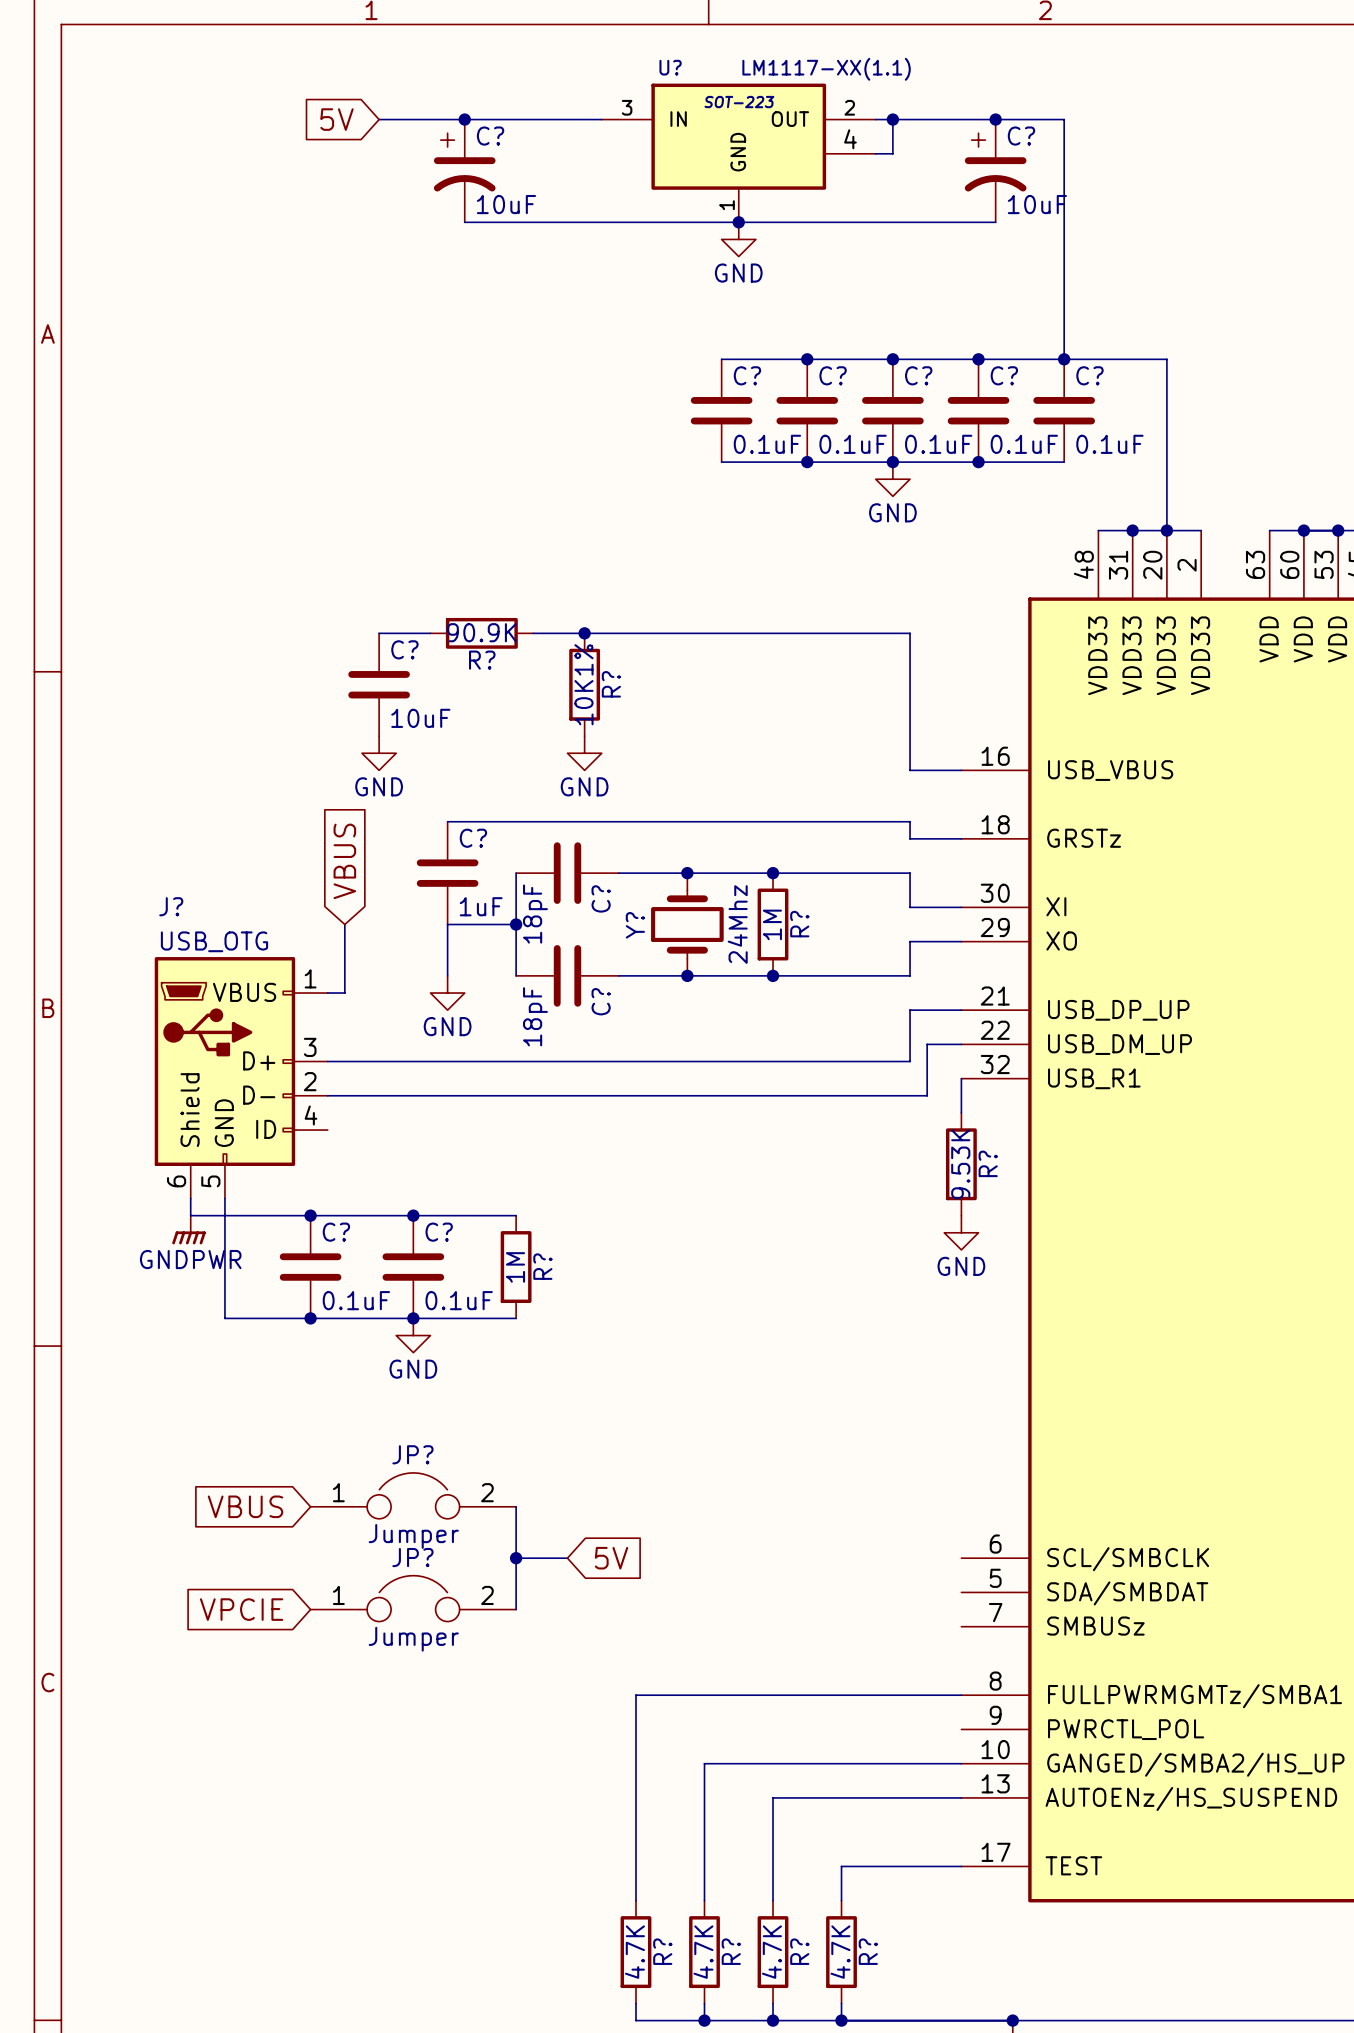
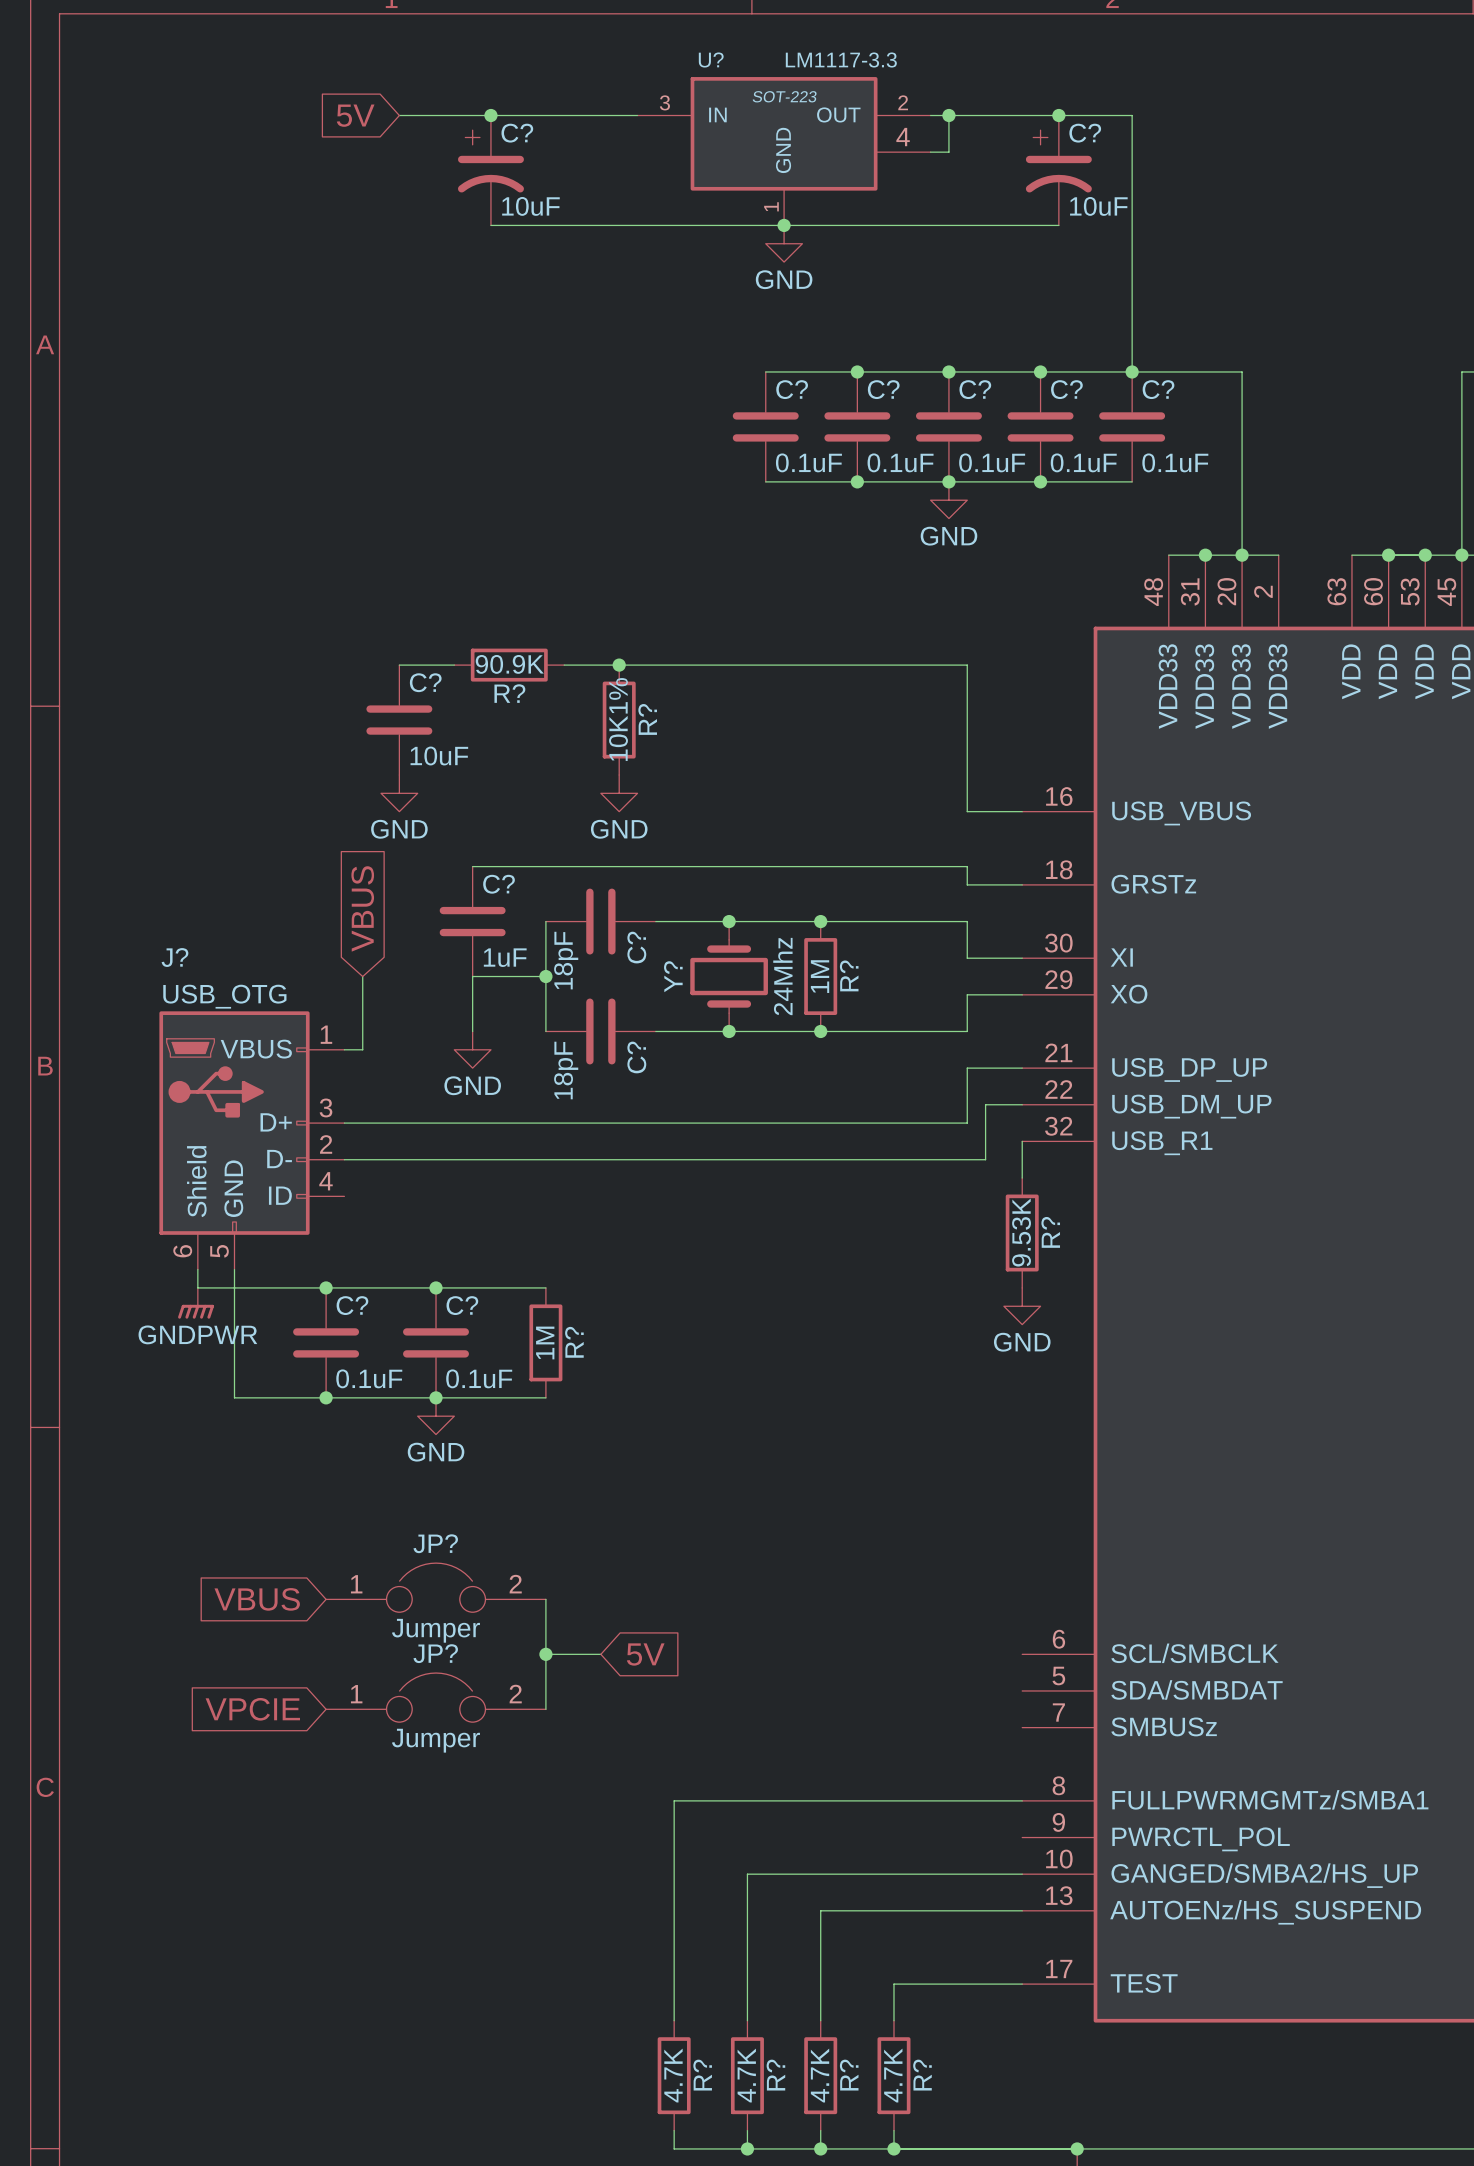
U? value: LM1117-XX(1.1) (826, 69) -> LM1117-3.3 (841, 60)

